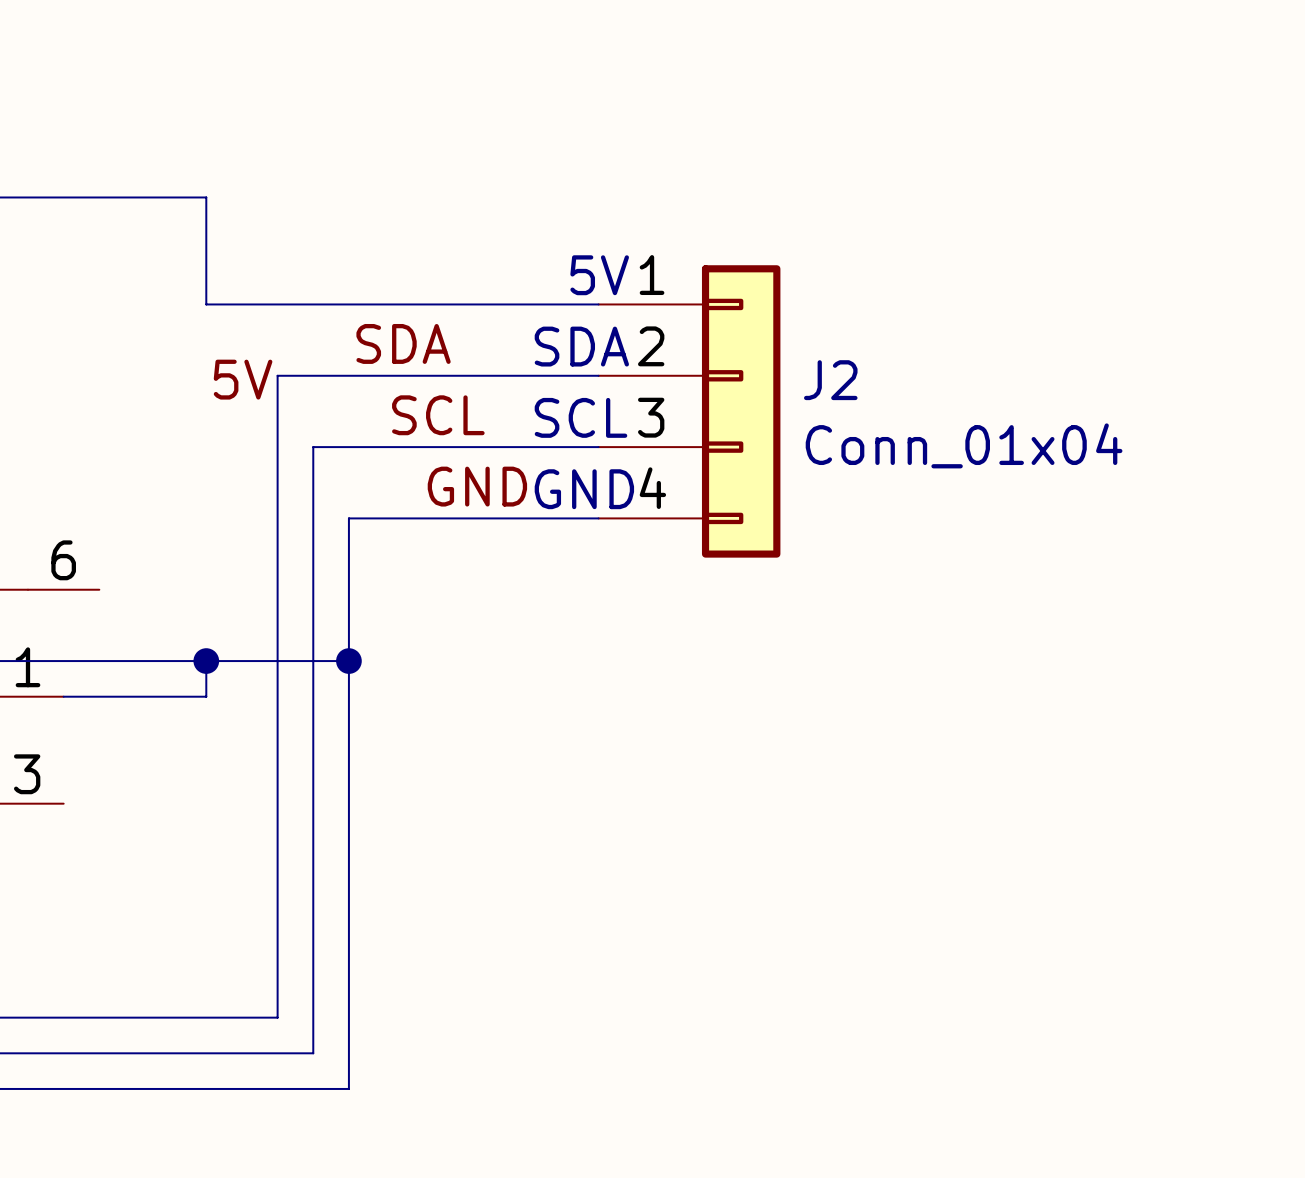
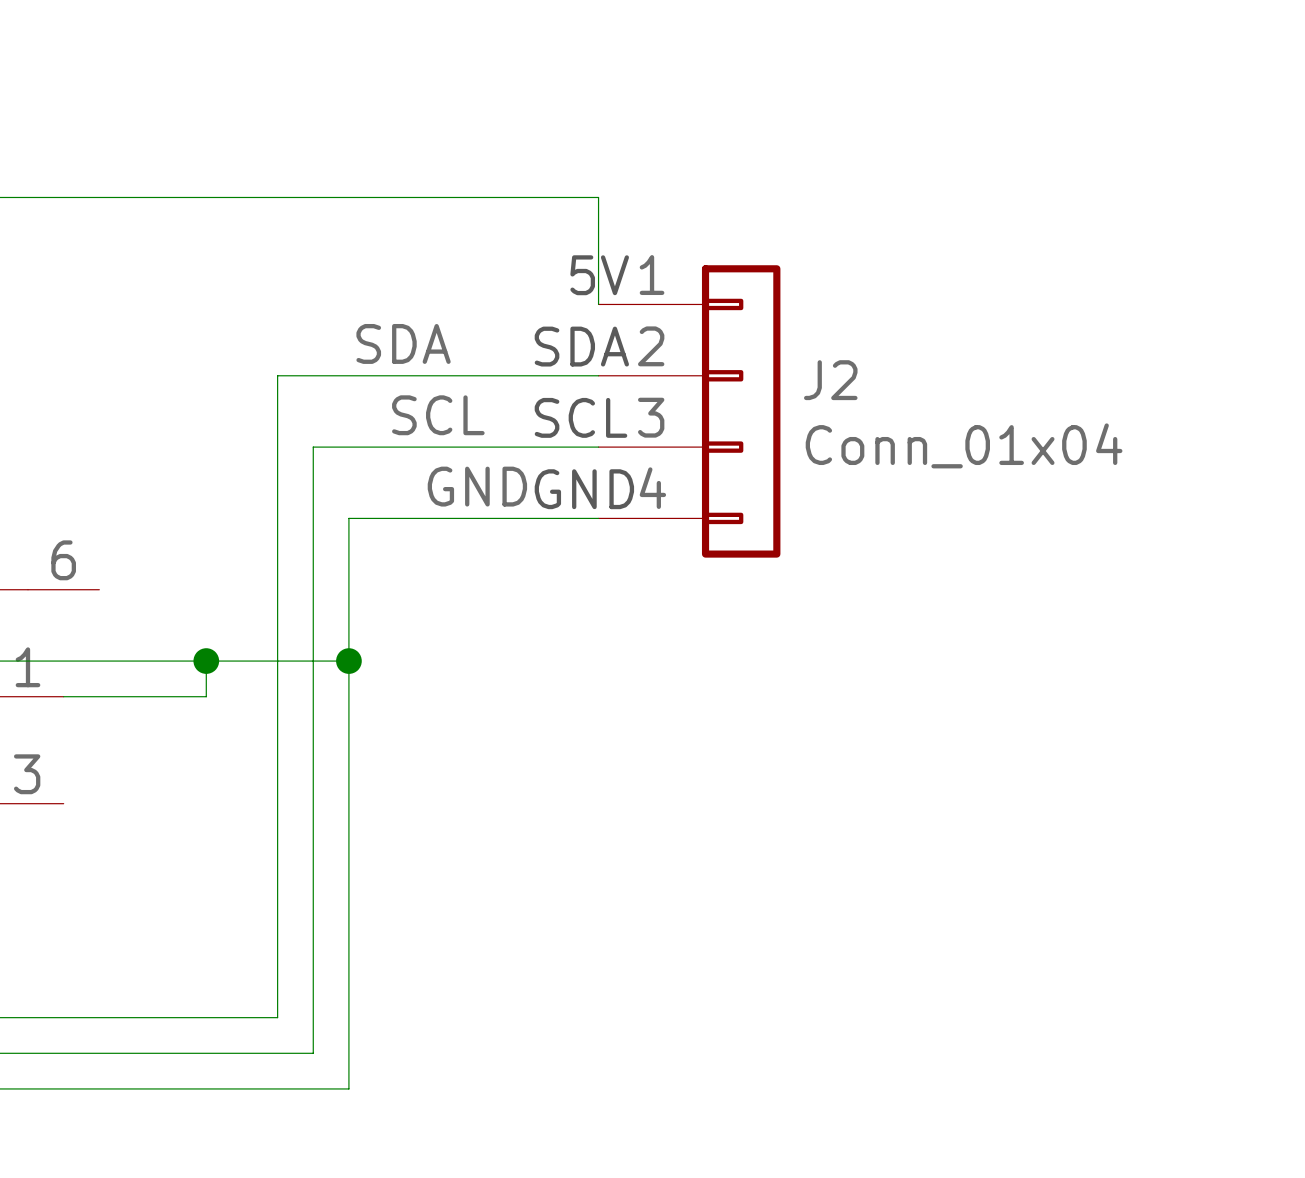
wire: (206, 197) (206, 304) (598, 304) -> (206, 197) (598, 197) (598, 304)
label: 5V (243, 379) -> none

